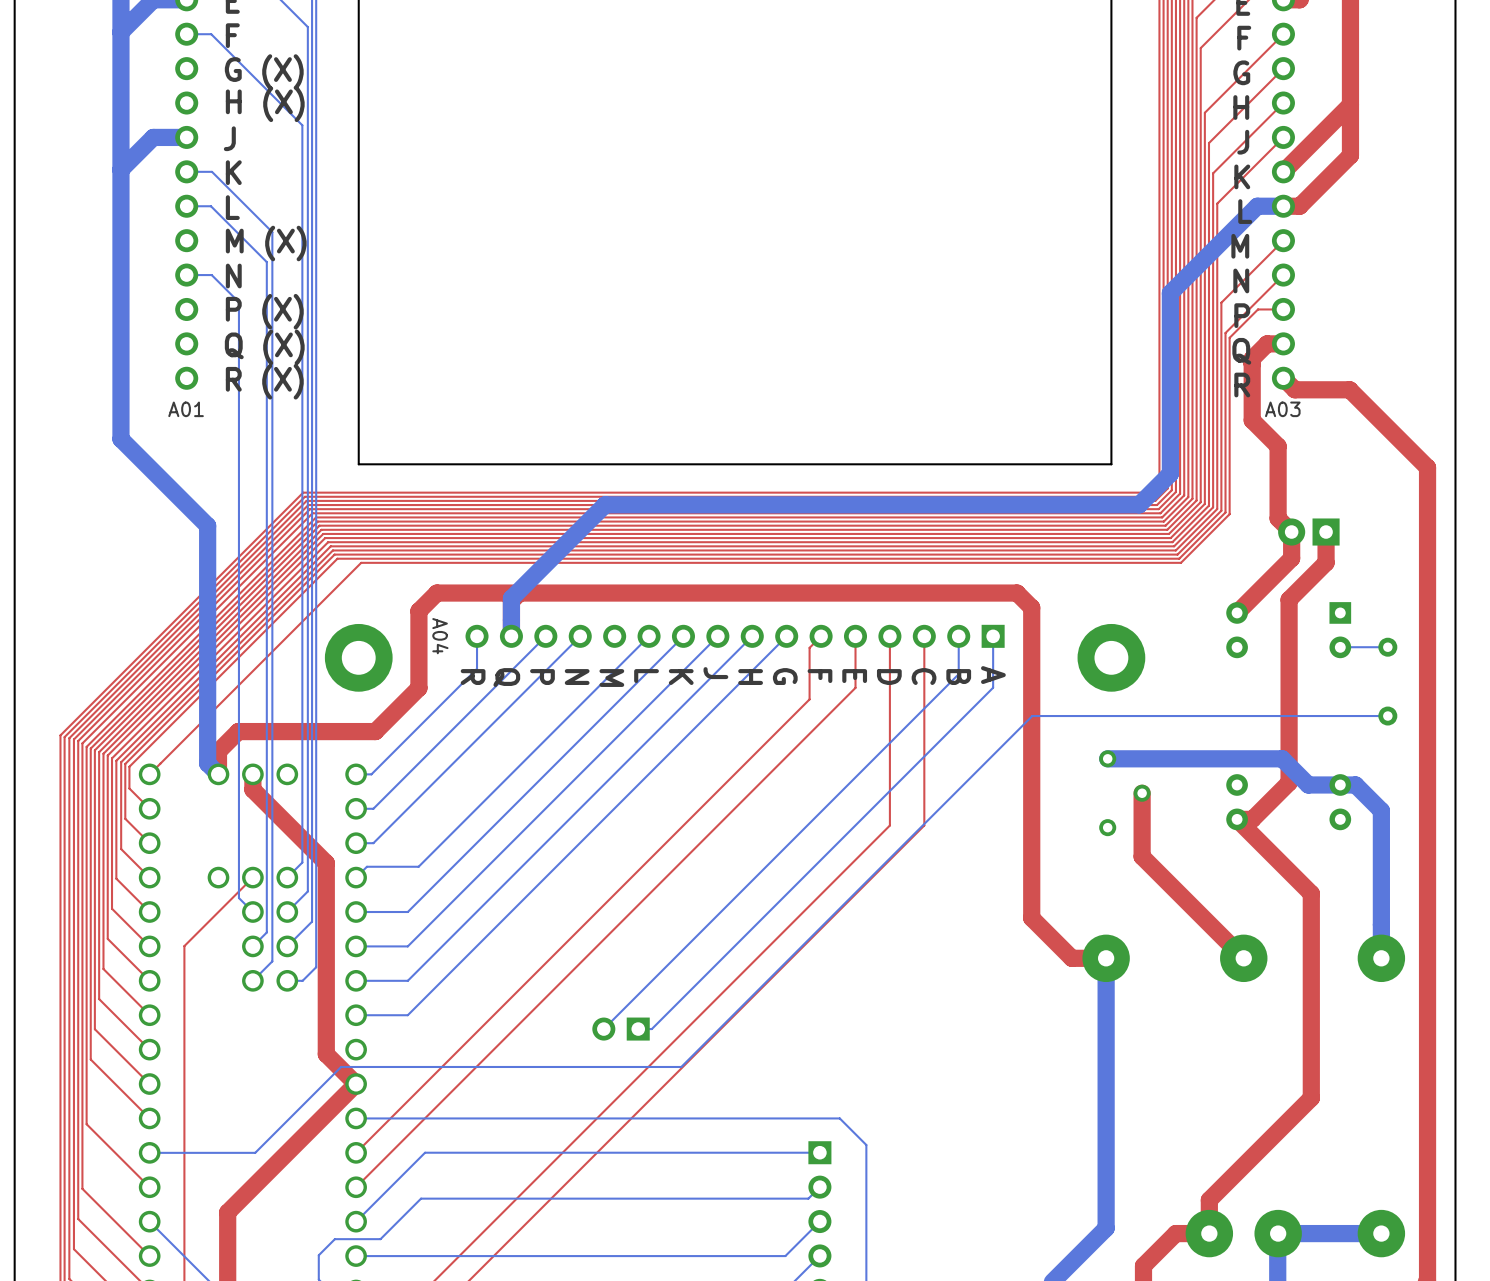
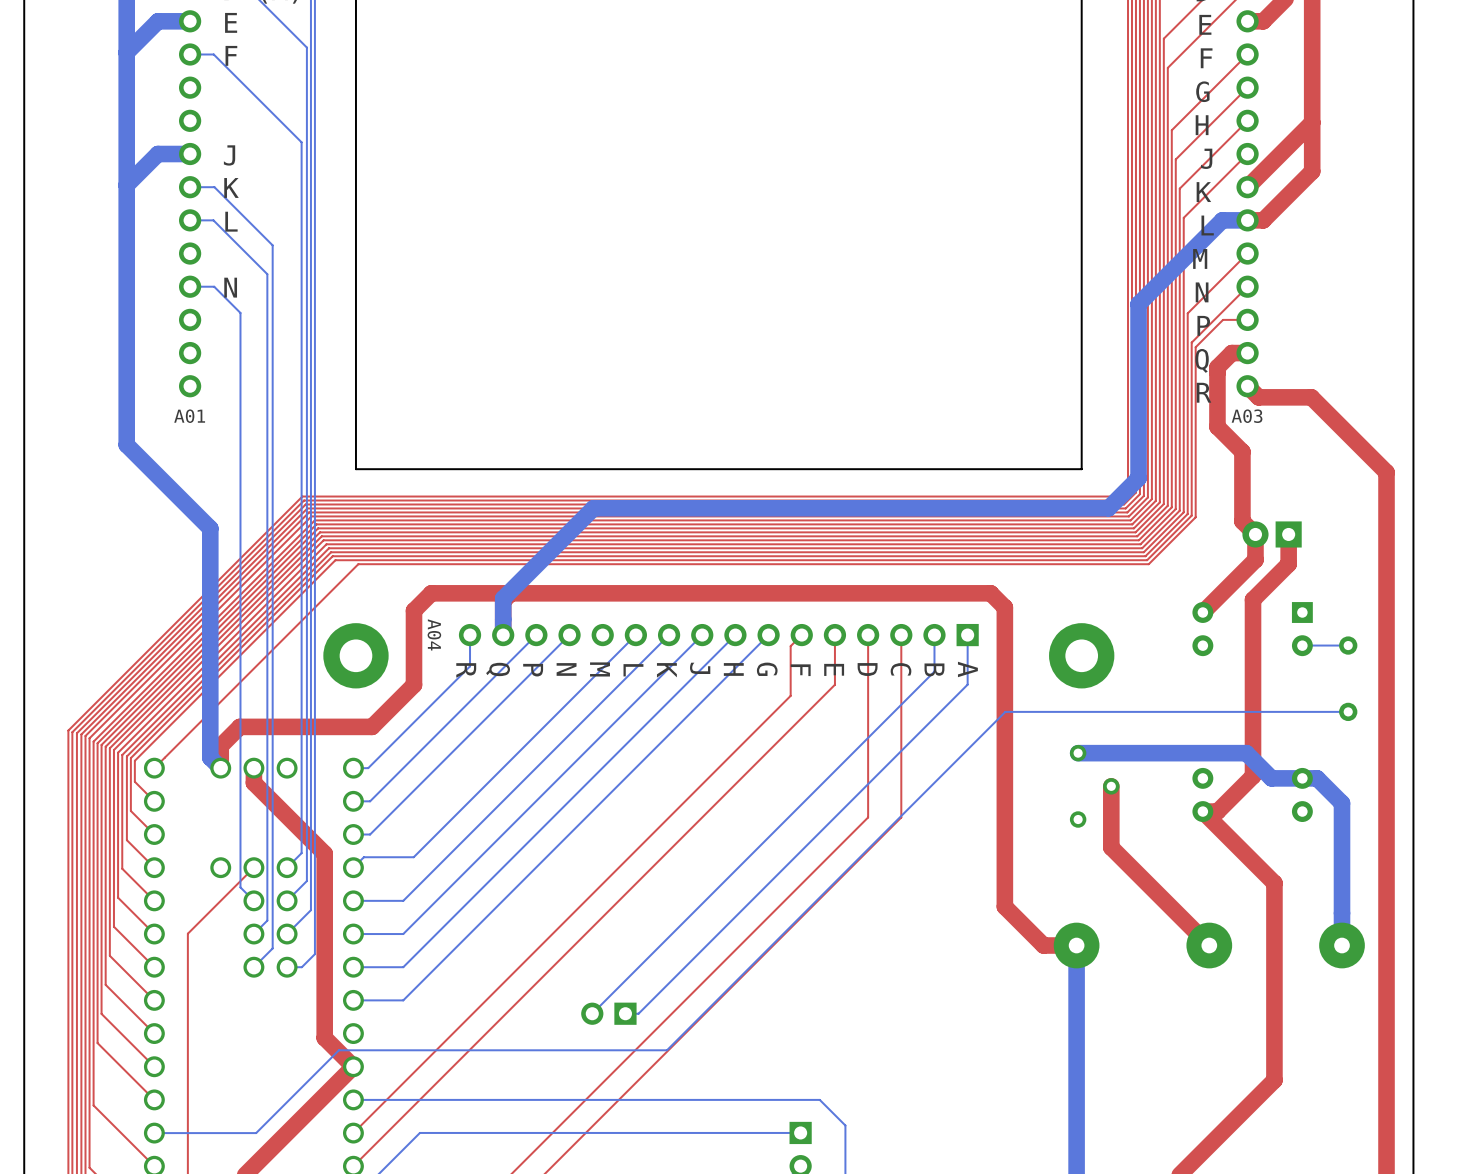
text: G (X) (264, 72) -> none
text: H (X) (265, 104) -> none
text: M (X) (266, 243) -> none
text: P (X) (264, 311) -> none
text: Q (X) (264, 347) -> none
text: R (X) (264, 381) -> none

